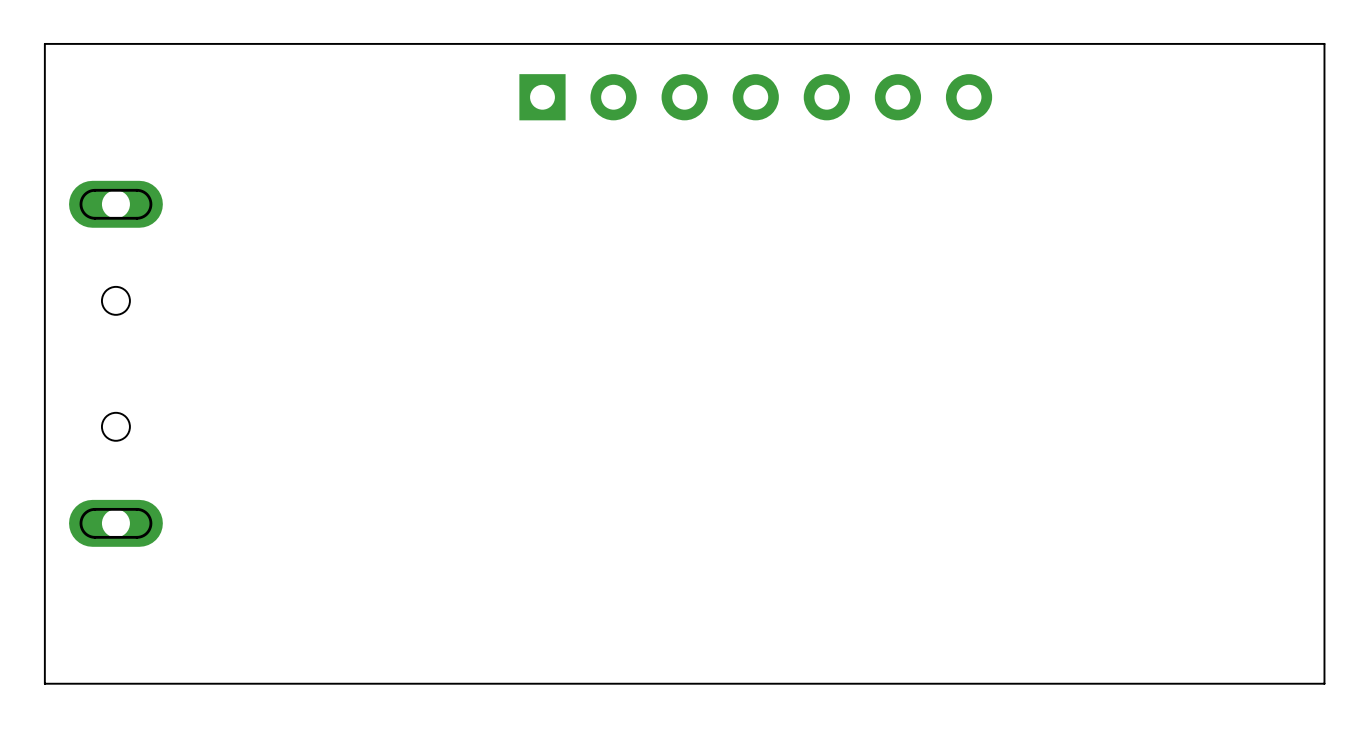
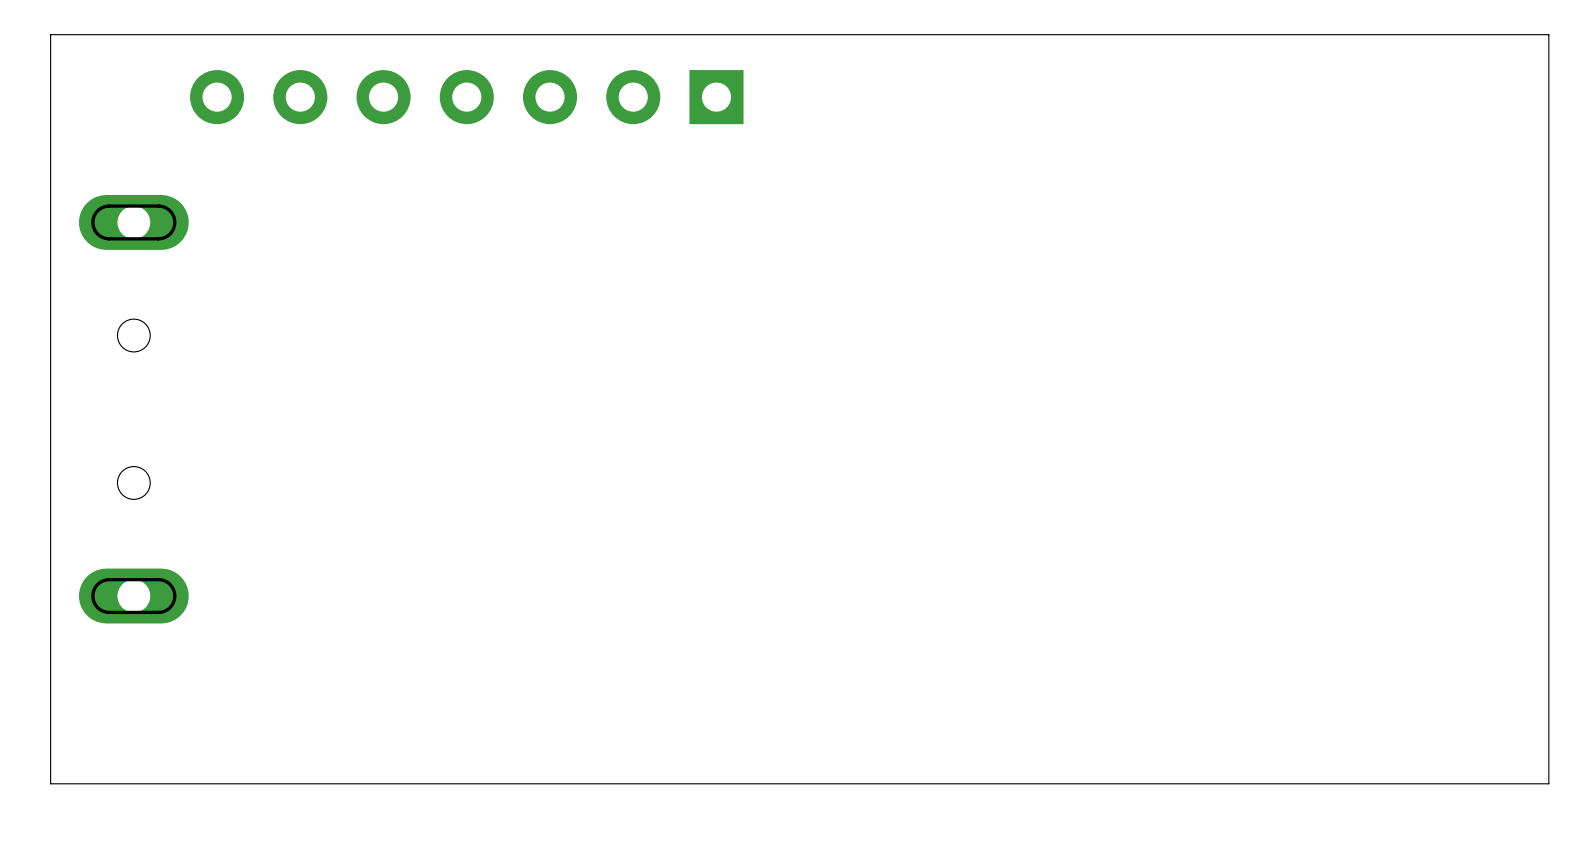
part rotation: 0° (755, 97) -> 180° (466, 97)
part position: (755, 97) -> (466, 97)

